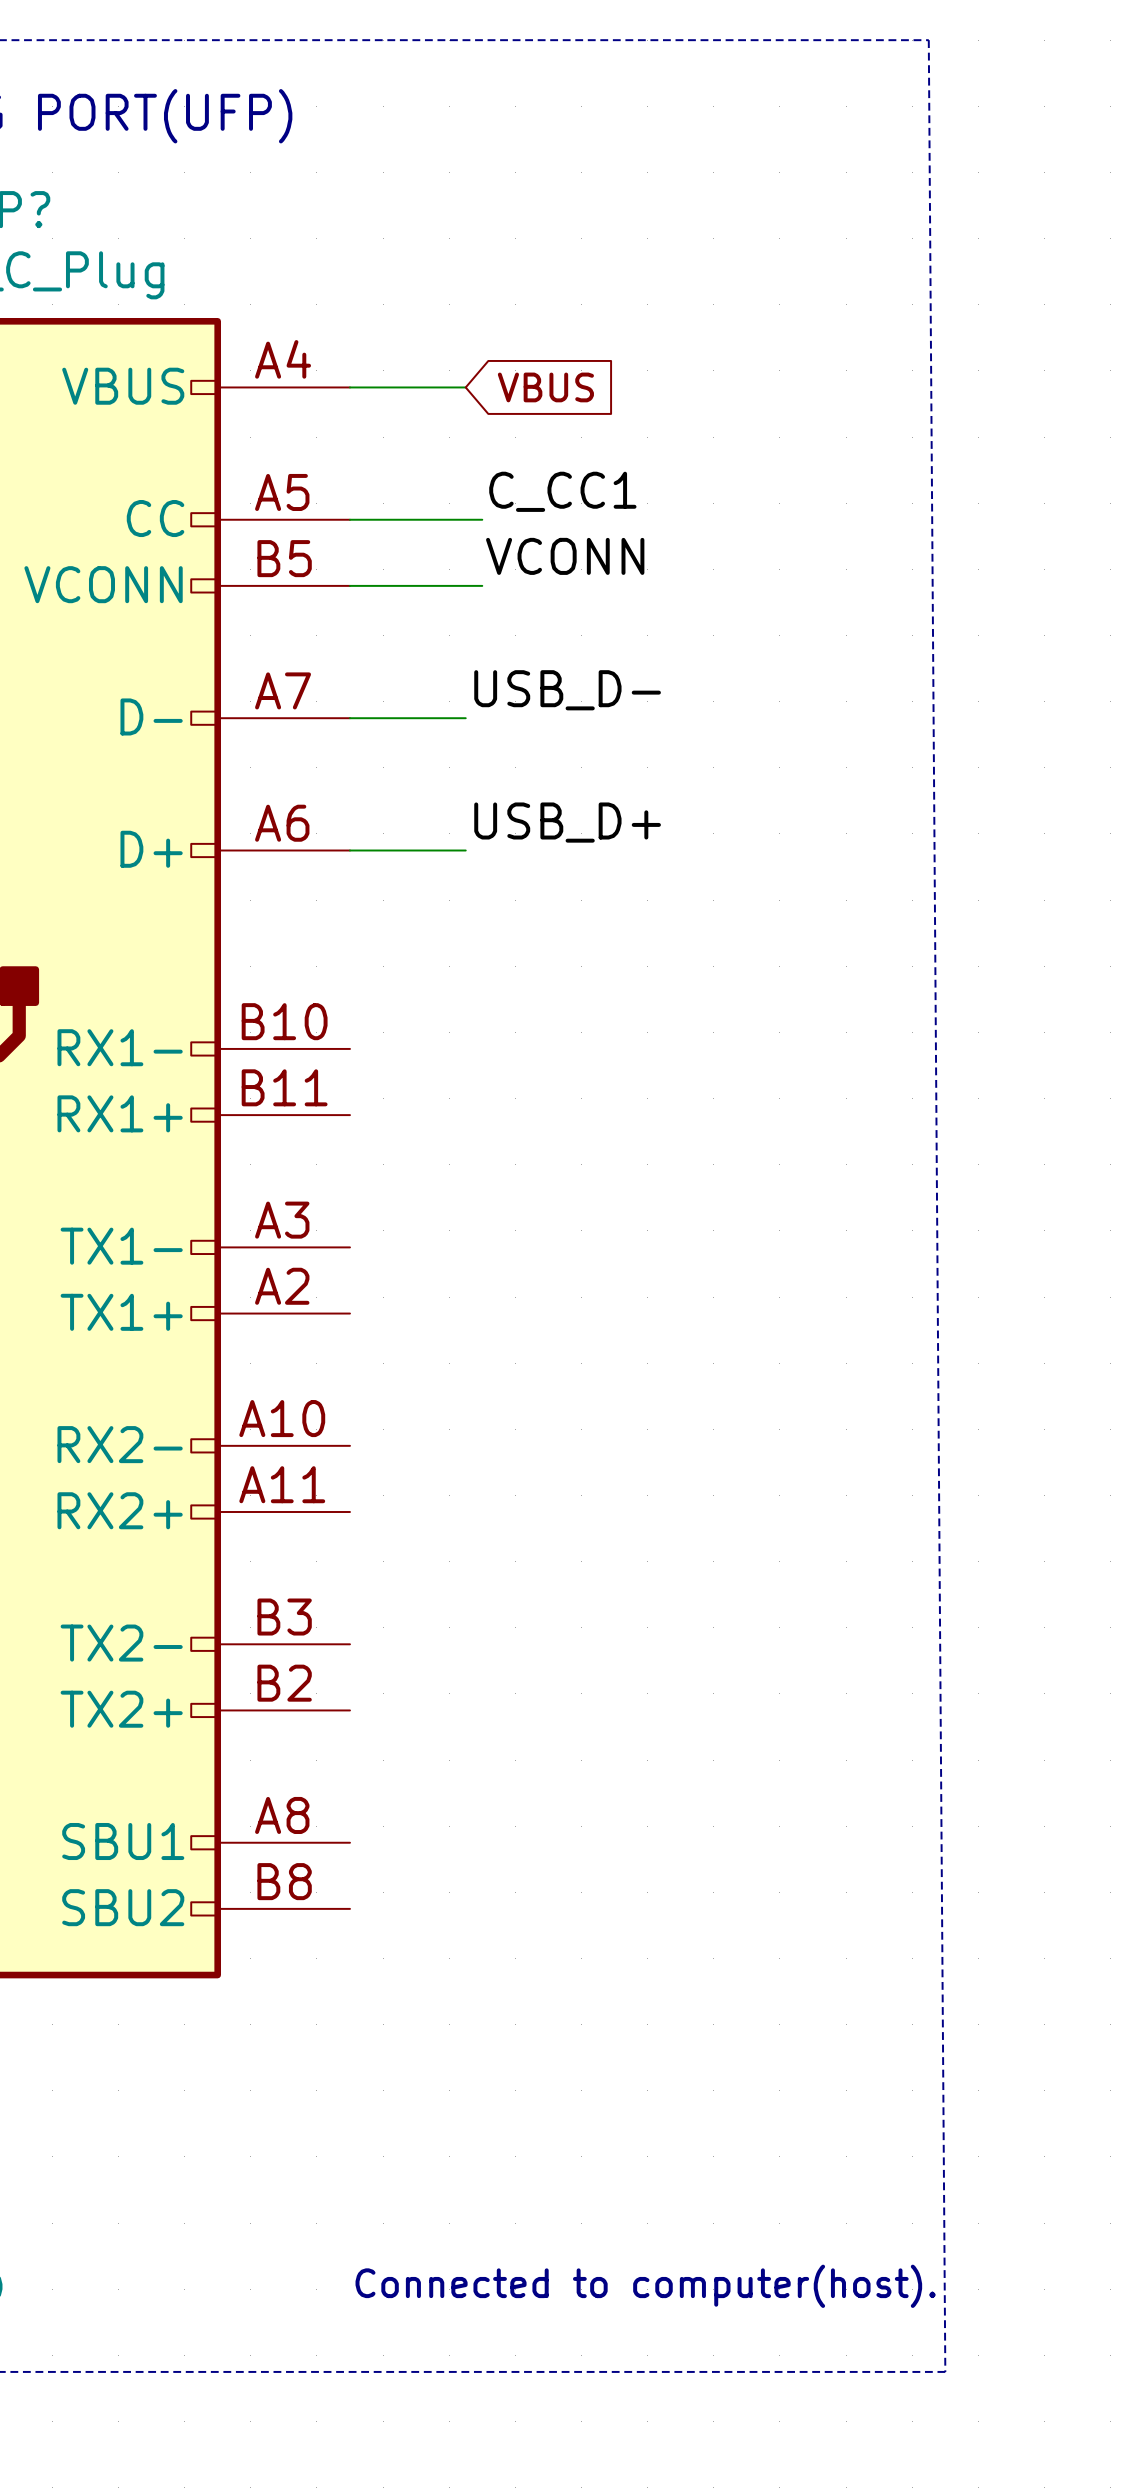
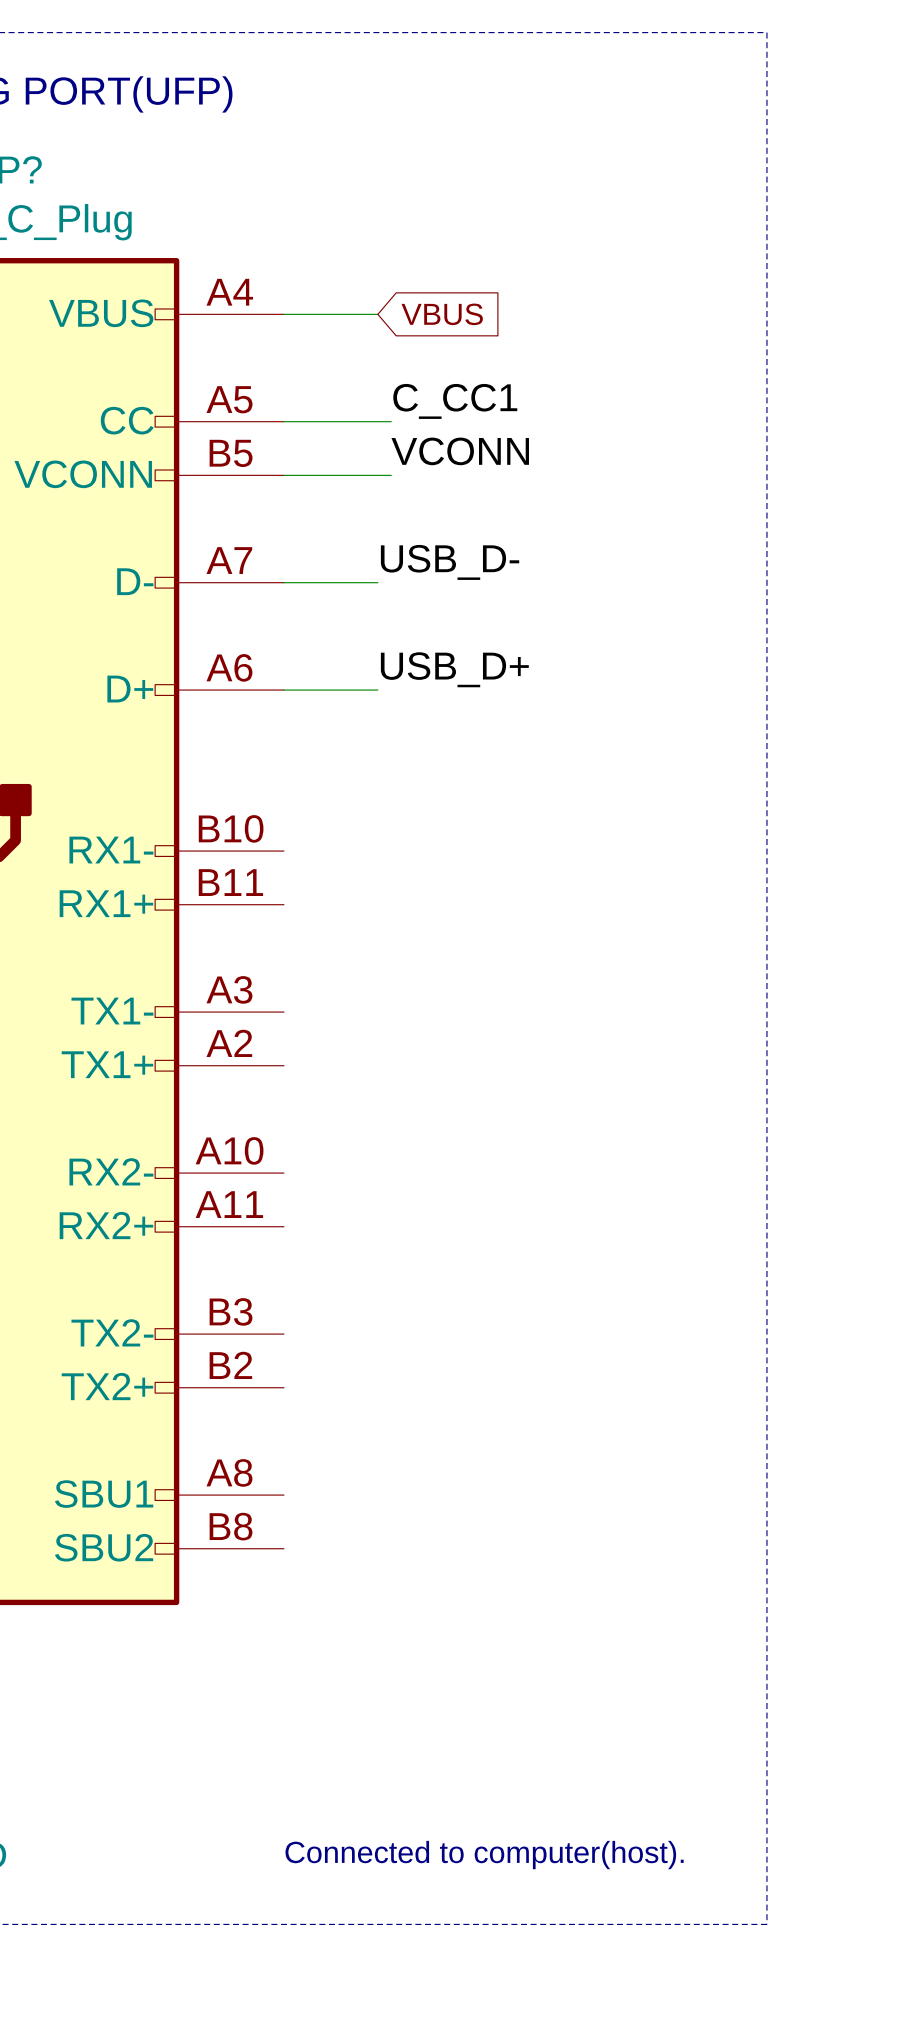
line: (928, 40) (945, 2371) -> (753, 32) (766, 32) (766, 1924)

